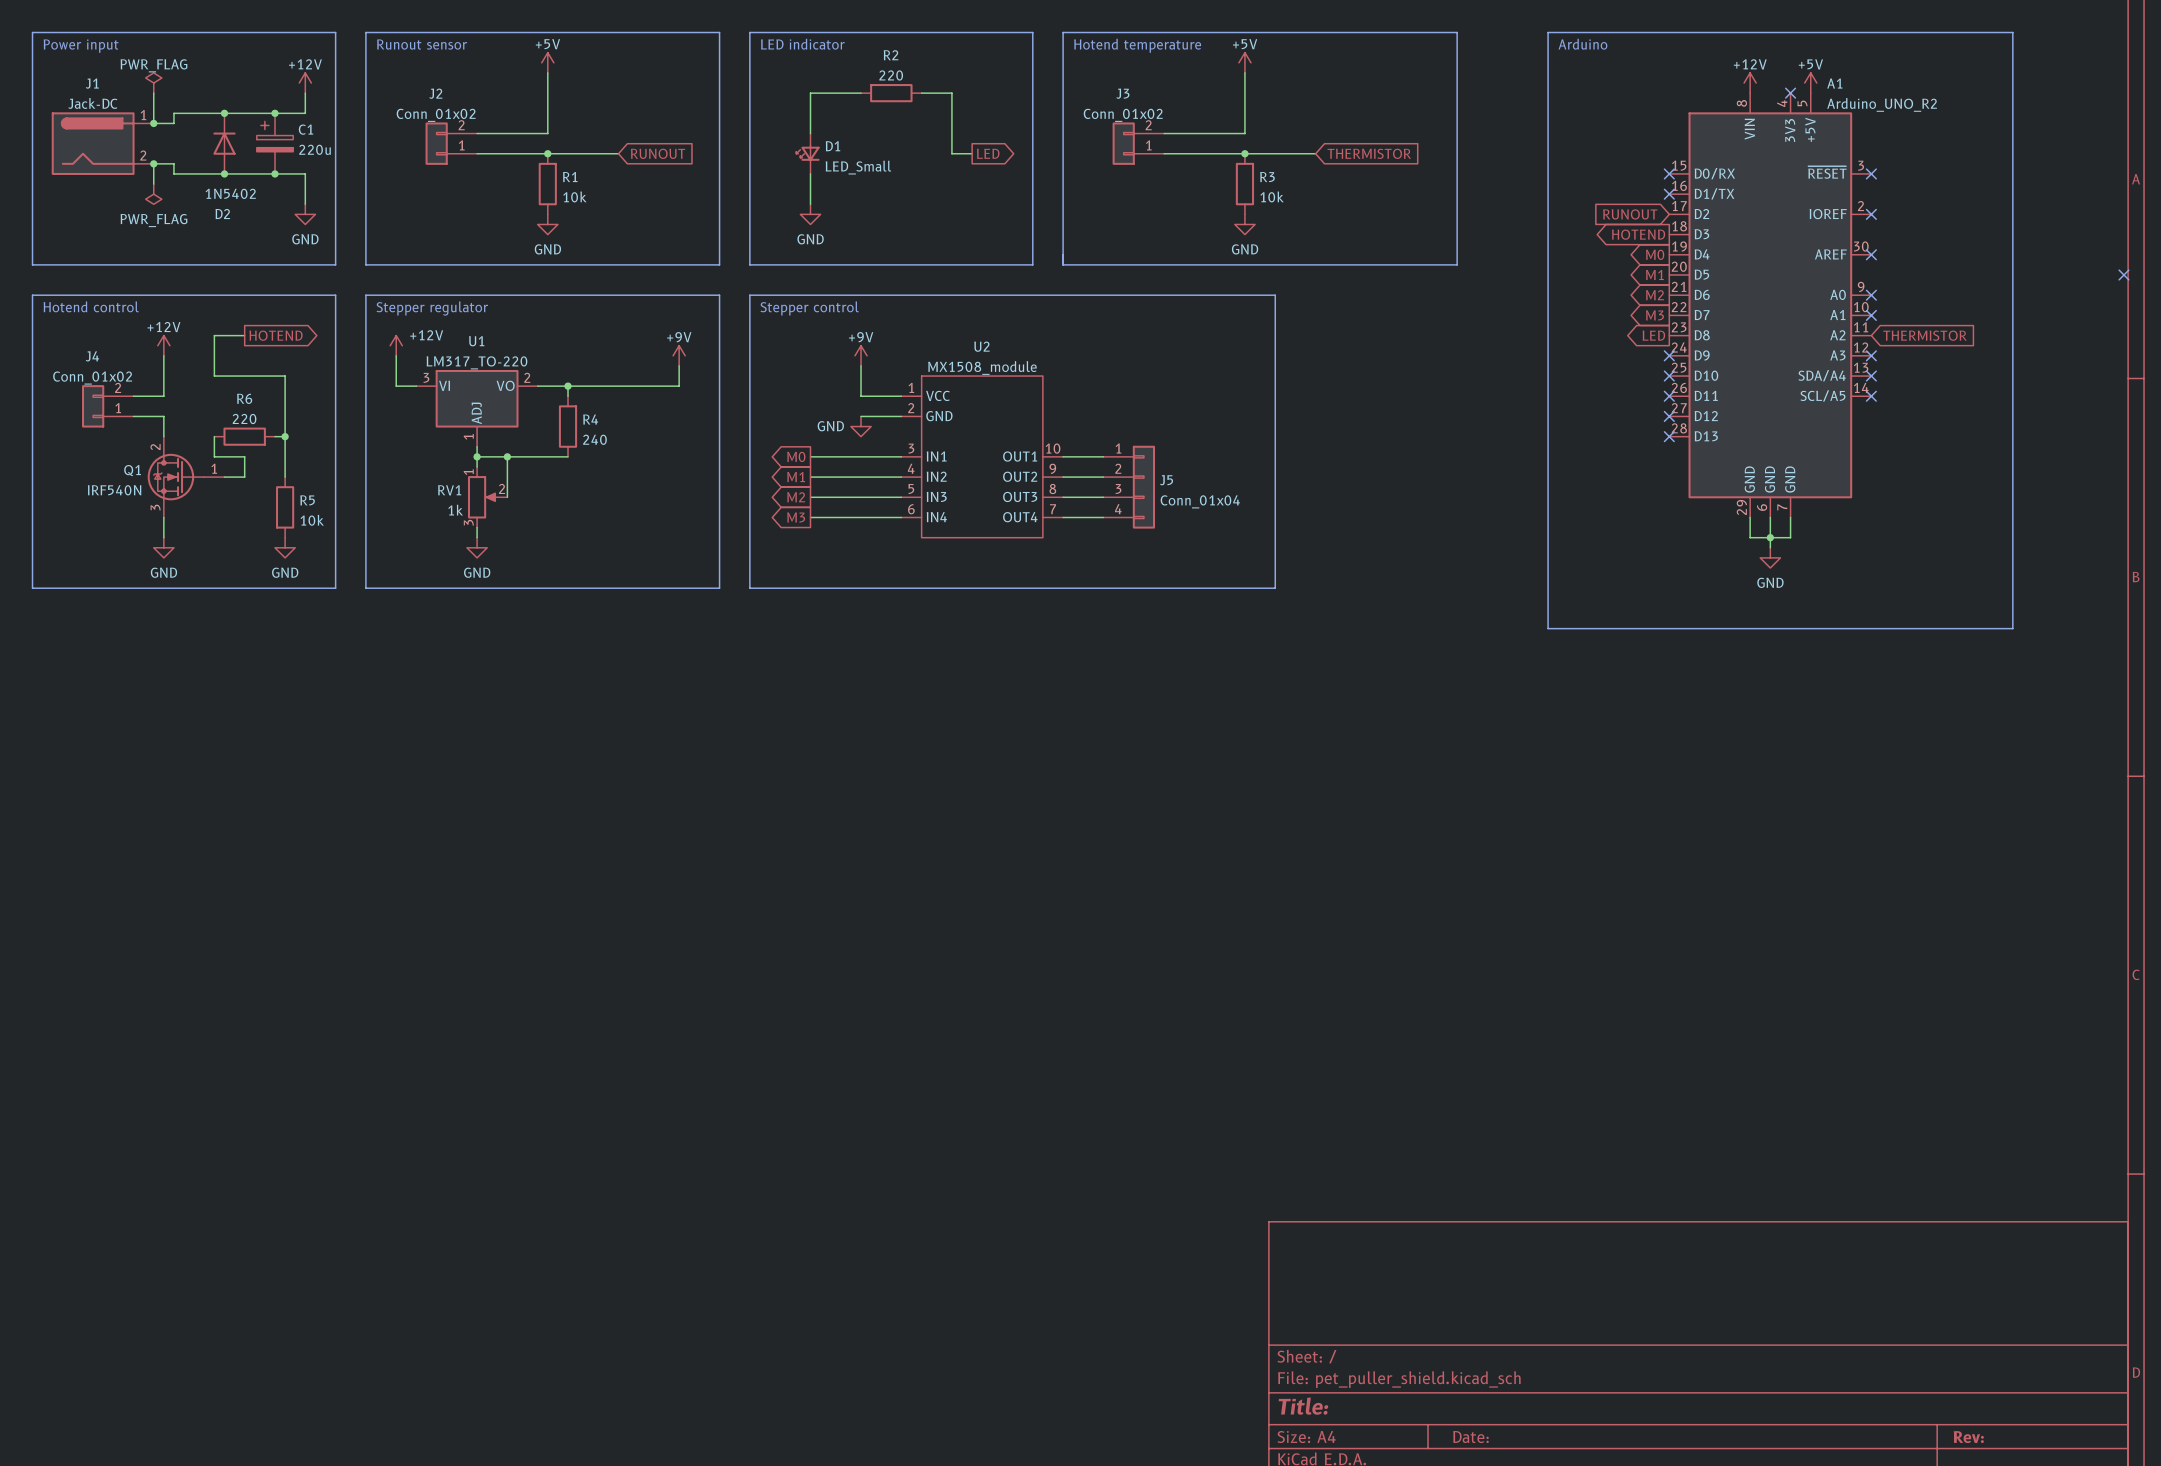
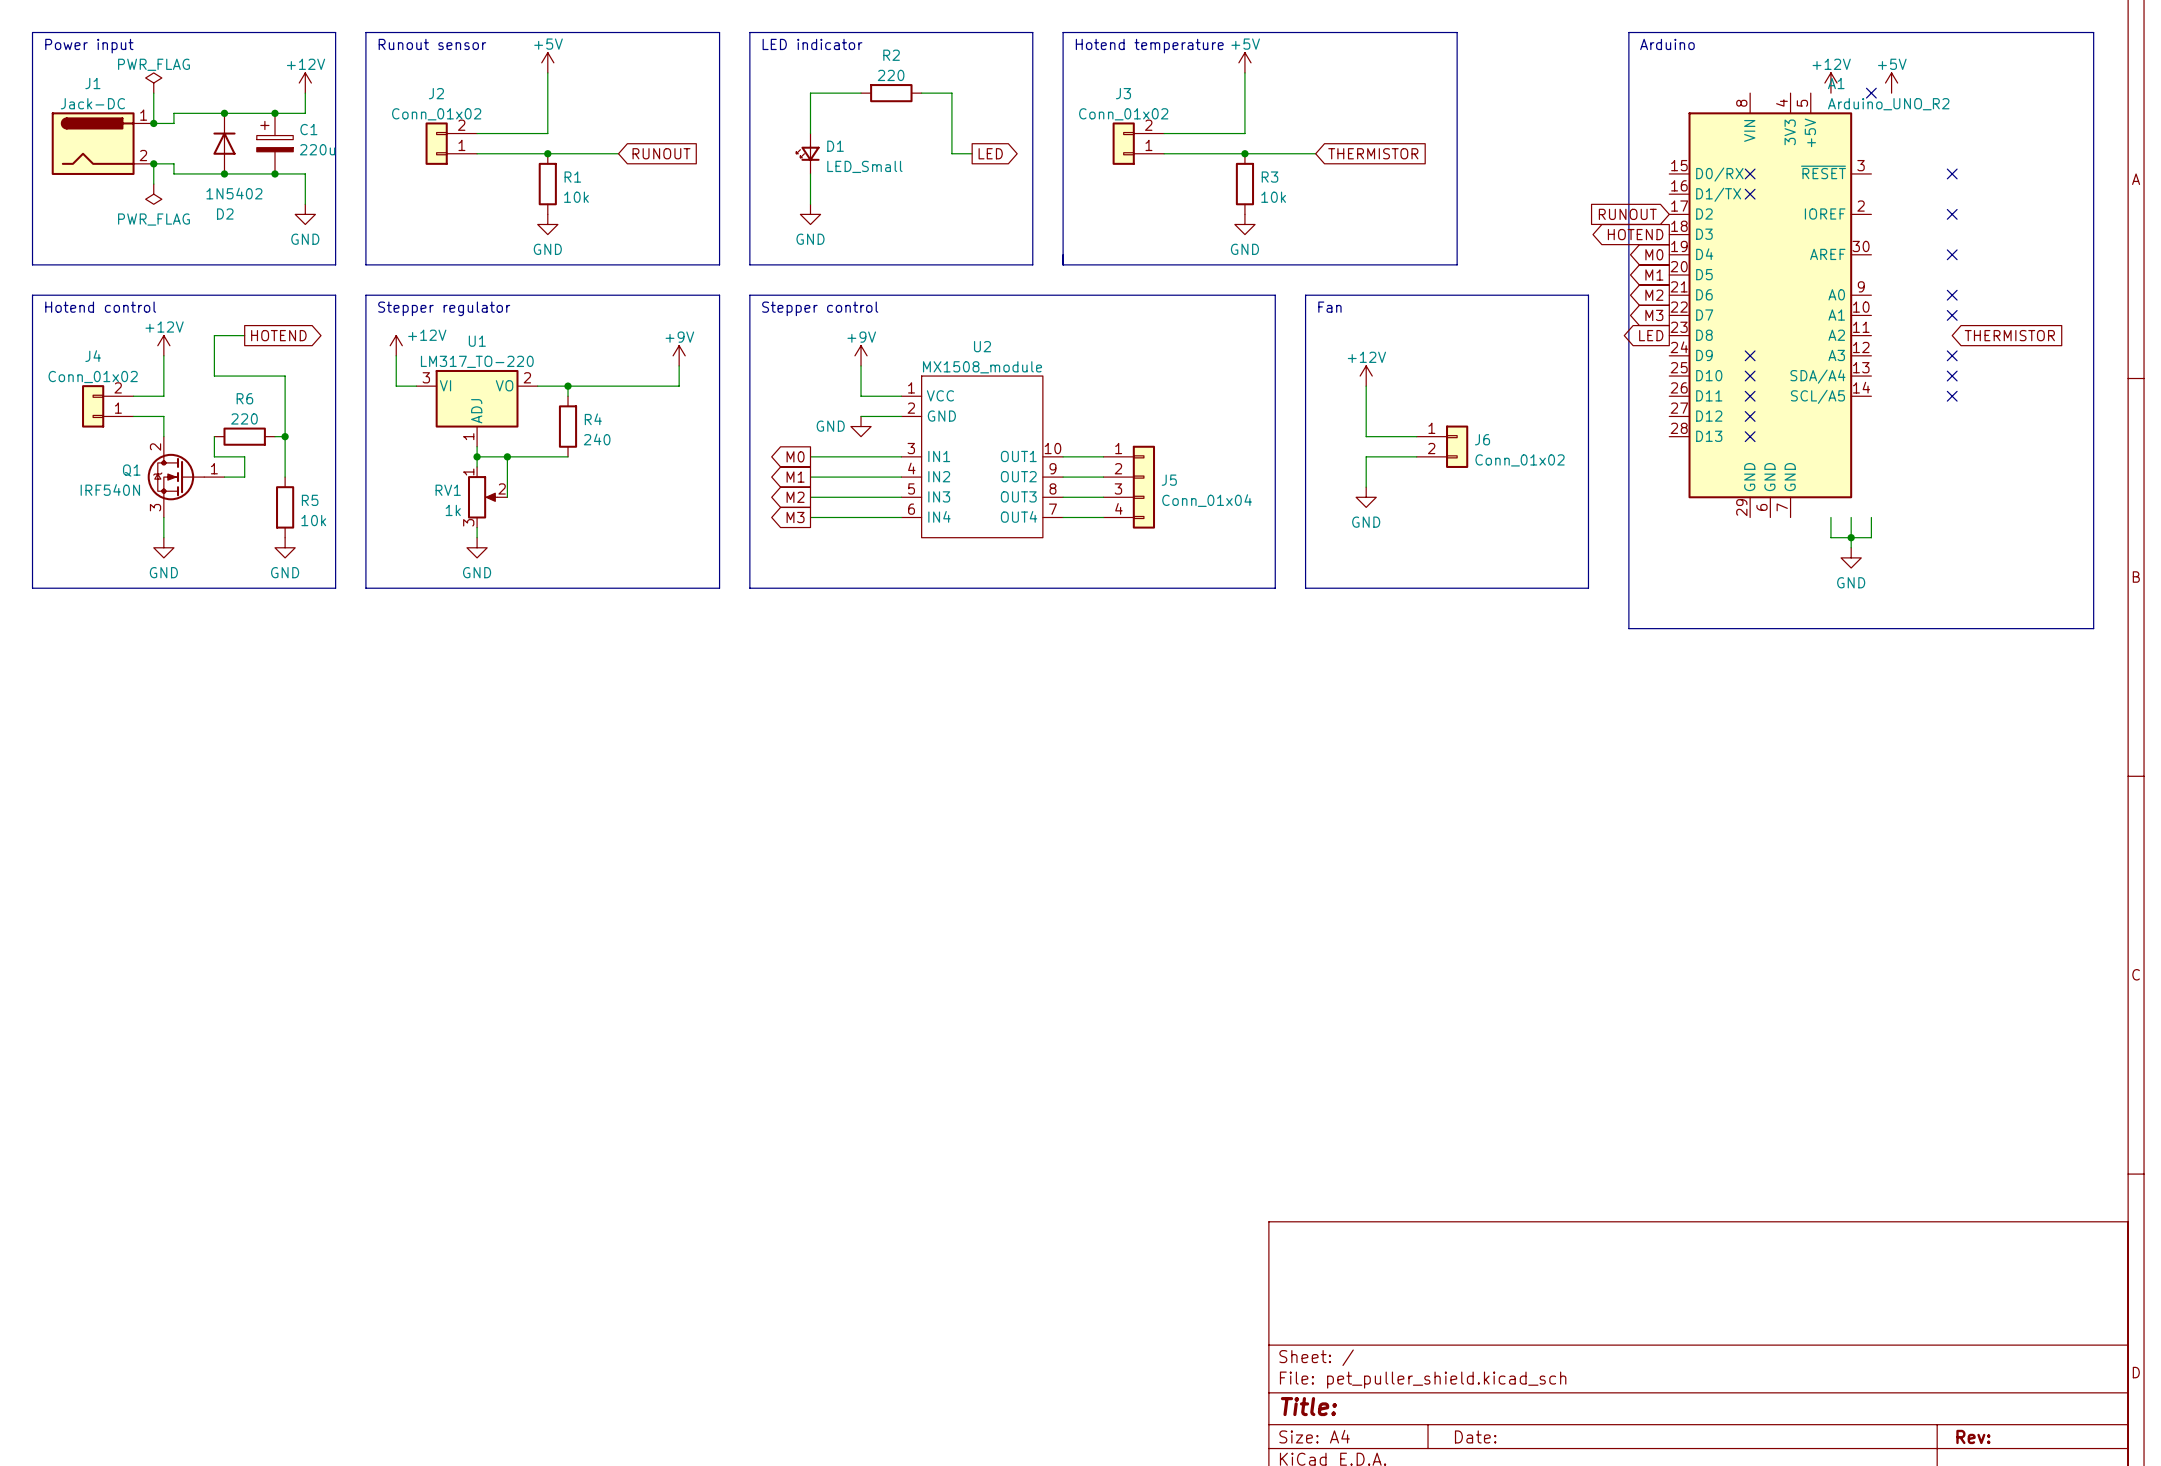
line: (1628, 32) (1548, 32) (1548, 628) (1628, 628) -> (1628, 32) (1628, 628)
line: (2012, 32) (2012, 628) -> (2012, 32) (2093, 32) (2093, 628) (2012, 628)
text position: Arduino (1582, 44) -> Arduino (1667, 44)
power symbol position: +12V (1750, 83) -> +12V (1830, 83)
power symbol position: +5V (1810, 83) -> +5V (1891, 83)
no-connect mark: (1790, 93) -> none
no-connect mark: none -> (1871, 93)
no-connect mark: (1669, 173) -> none
no-connect mark: none -> (1750, 173)
no-connect mark: (1871, 173) -> none
no-connect mark: none -> (1952, 173)
no-connect mark: (1669, 194) -> none
no-connect mark: none -> (1750, 194)
no-connect mark: (1871, 214) -> none
no-connect mark: none -> (1952, 214)
no-connect mark: (1871, 254) -> none
no-connect mark: none -> (1952, 254)
no-connect mark: (2123, 275) -> none
line: none -> (1305, 295) (1588, 295) (1588, 588) (1305, 588) (1305, 295)
no-connect mark: (1871, 295) -> none
no-connect mark: none -> (1952, 295)
text: none -> Fan (1329, 307)
no-connect mark: (1871, 315) -> none
no-connect mark: none -> (1952, 315)
global label position: THERMISTOR (1925, 335) -> THERMISTOR (2009, 335)
no-connect mark: (1669, 355) -> none
no-connect mark: none -> (1750, 355)
no-connect mark: (1871, 355) -> none
no-connect mark: none -> (1952, 355)
power symbol: none -> +12V (1366, 376)
no-connect mark: (1669, 376) -> none
no-connect mark: none -> (1750, 376)
no-connect mark: (1871, 376) -> none
no-connect mark: none -> (1952, 376)
wire: none -> (1366, 386) (1366, 436) (1416, 436)
no-connect mark: (1669, 396) -> none
no-connect mark: none -> (1750, 396)
no-connect mark: (1871, 396) -> none
no-connect mark: none -> (1952, 396)
no-connect mark: (1669, 416) -> none
no-connect mark: none -> (1750, 416)
no-connect mark: (1669, 436) -> none
no-connect mark: none -> (1750, 436)
J6: none -> Conn_01x02 (1442, 446)
wire: none -> (1416, 456) (1366, 456) (1366, 487)
power symbol: none -> GND (1366, 497)
wire: (1750, 517) (1750, 537) (1790, 537) (1790, 517) -> (1830, 517) (1830, 537) (1871, 537) (1871, 517)
wire: (1770, 517) (1770, 547) -> (1851, 517) (1851, 547)
junction: (1770, 537) -> none
junction: none -> (1851, 537)
power symbol position: GND (1770, 557) -> GND (1851, 557)

